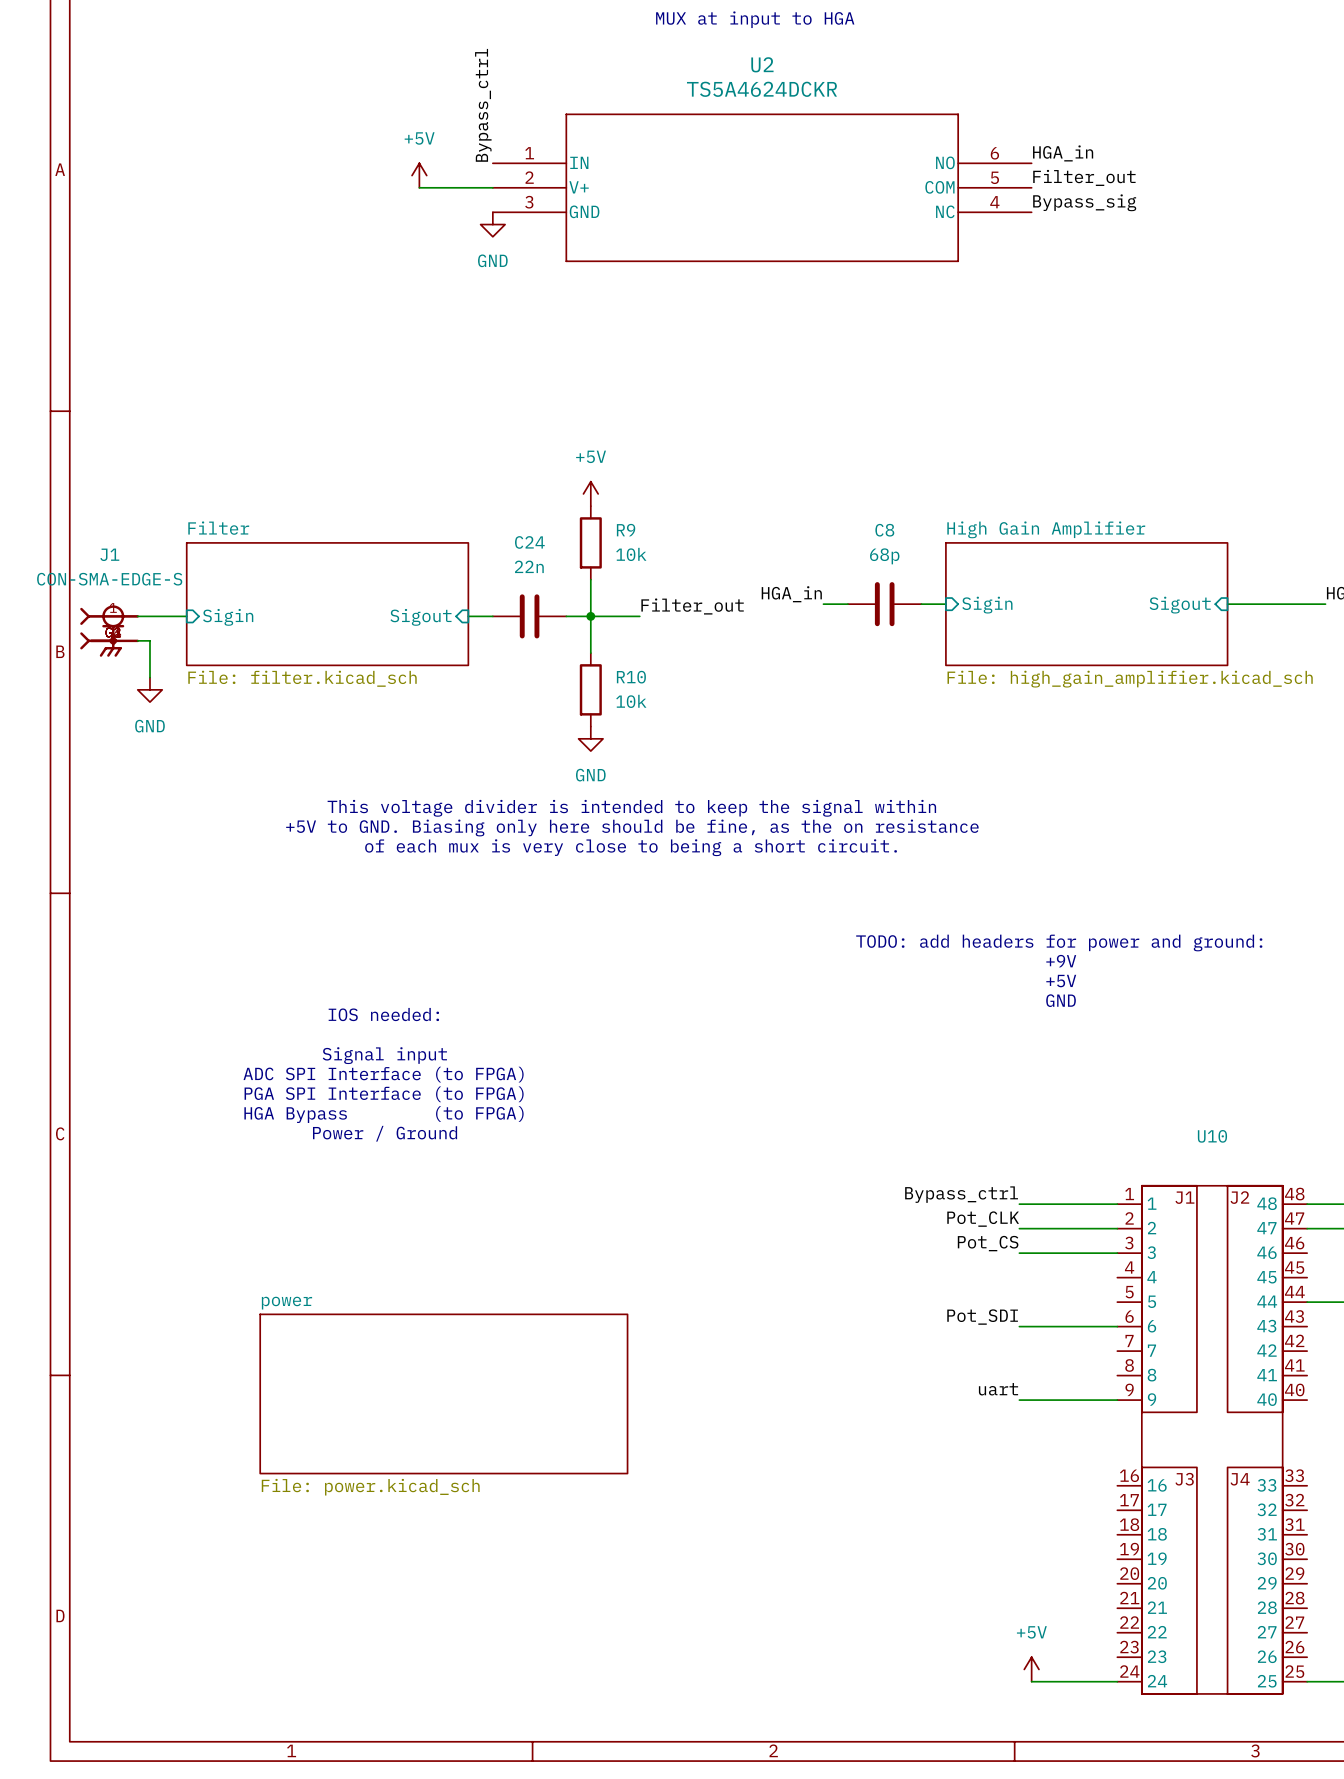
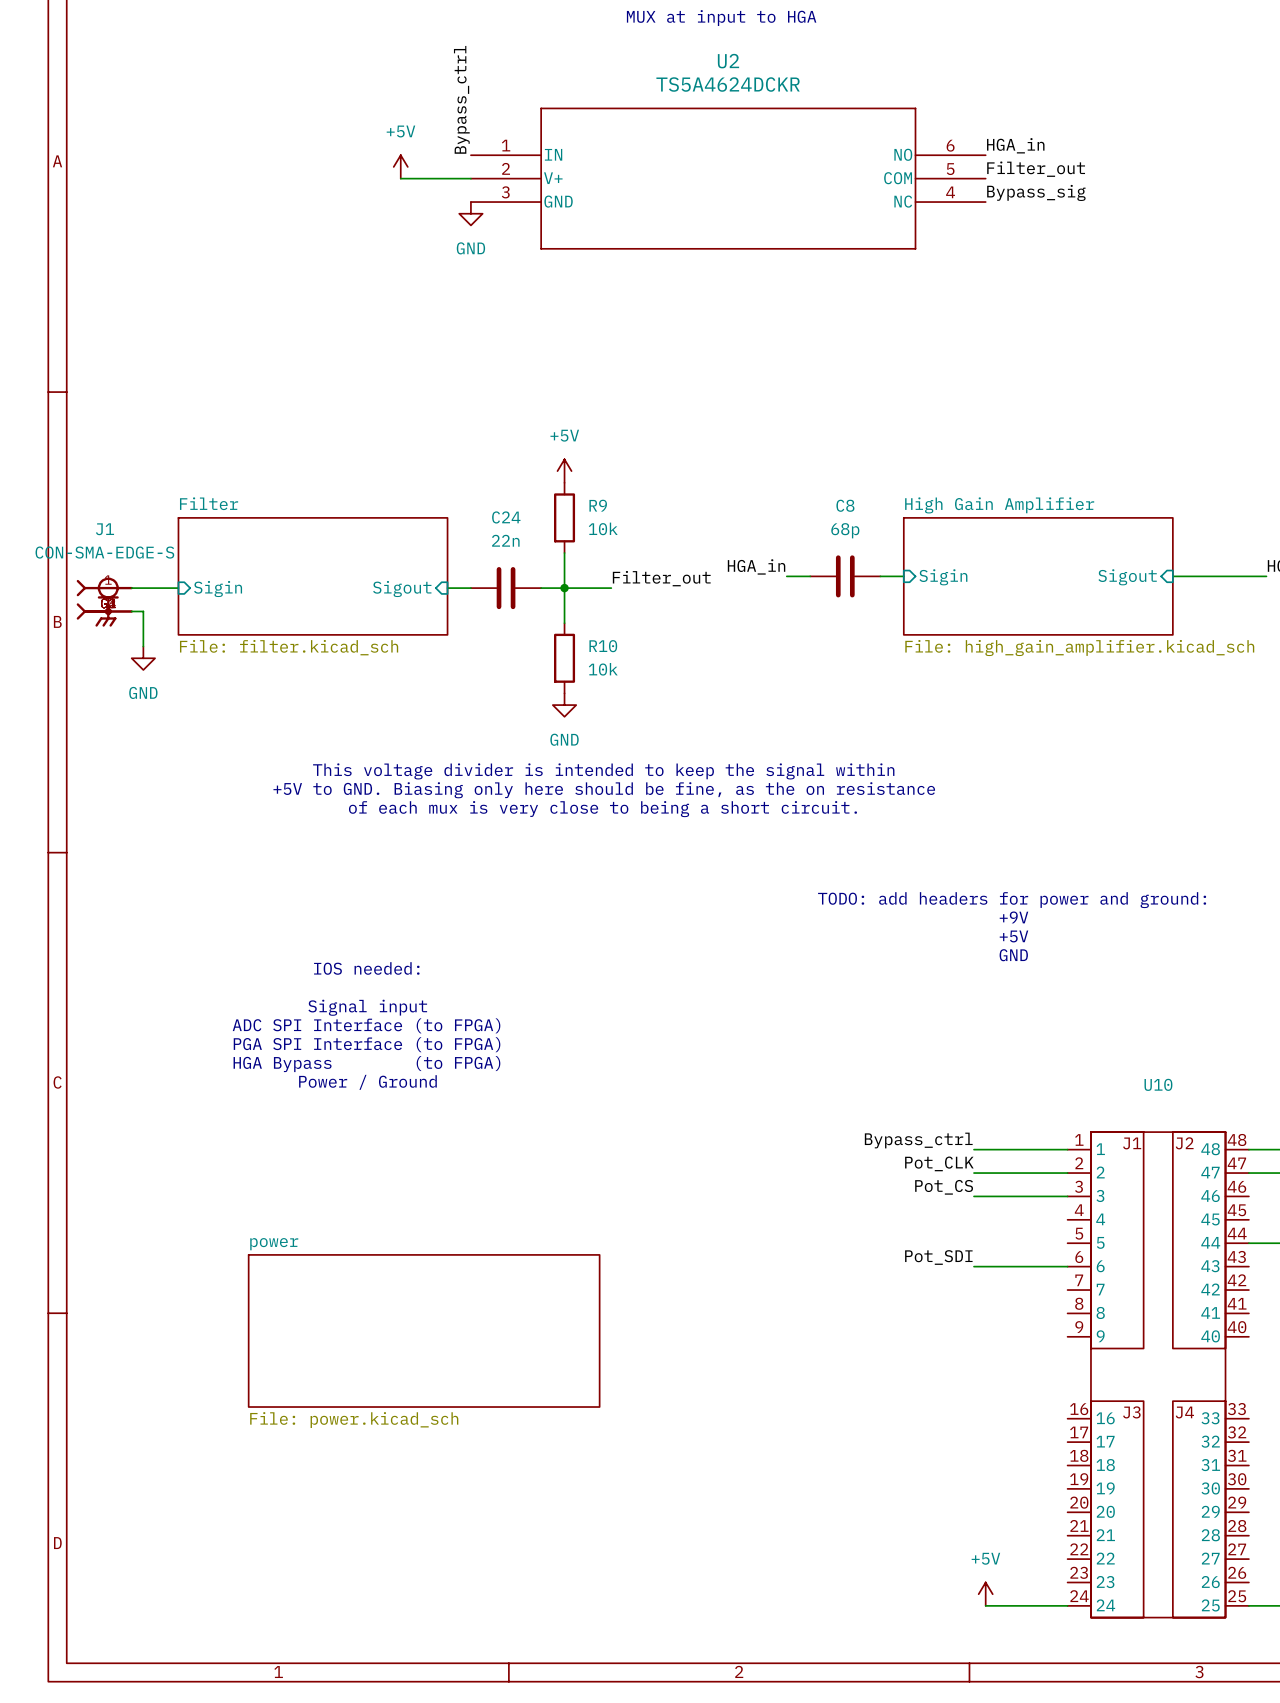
label: uart (998, 1389) -> none
wire: (1019, 1400) (1117, 1400) -> none

